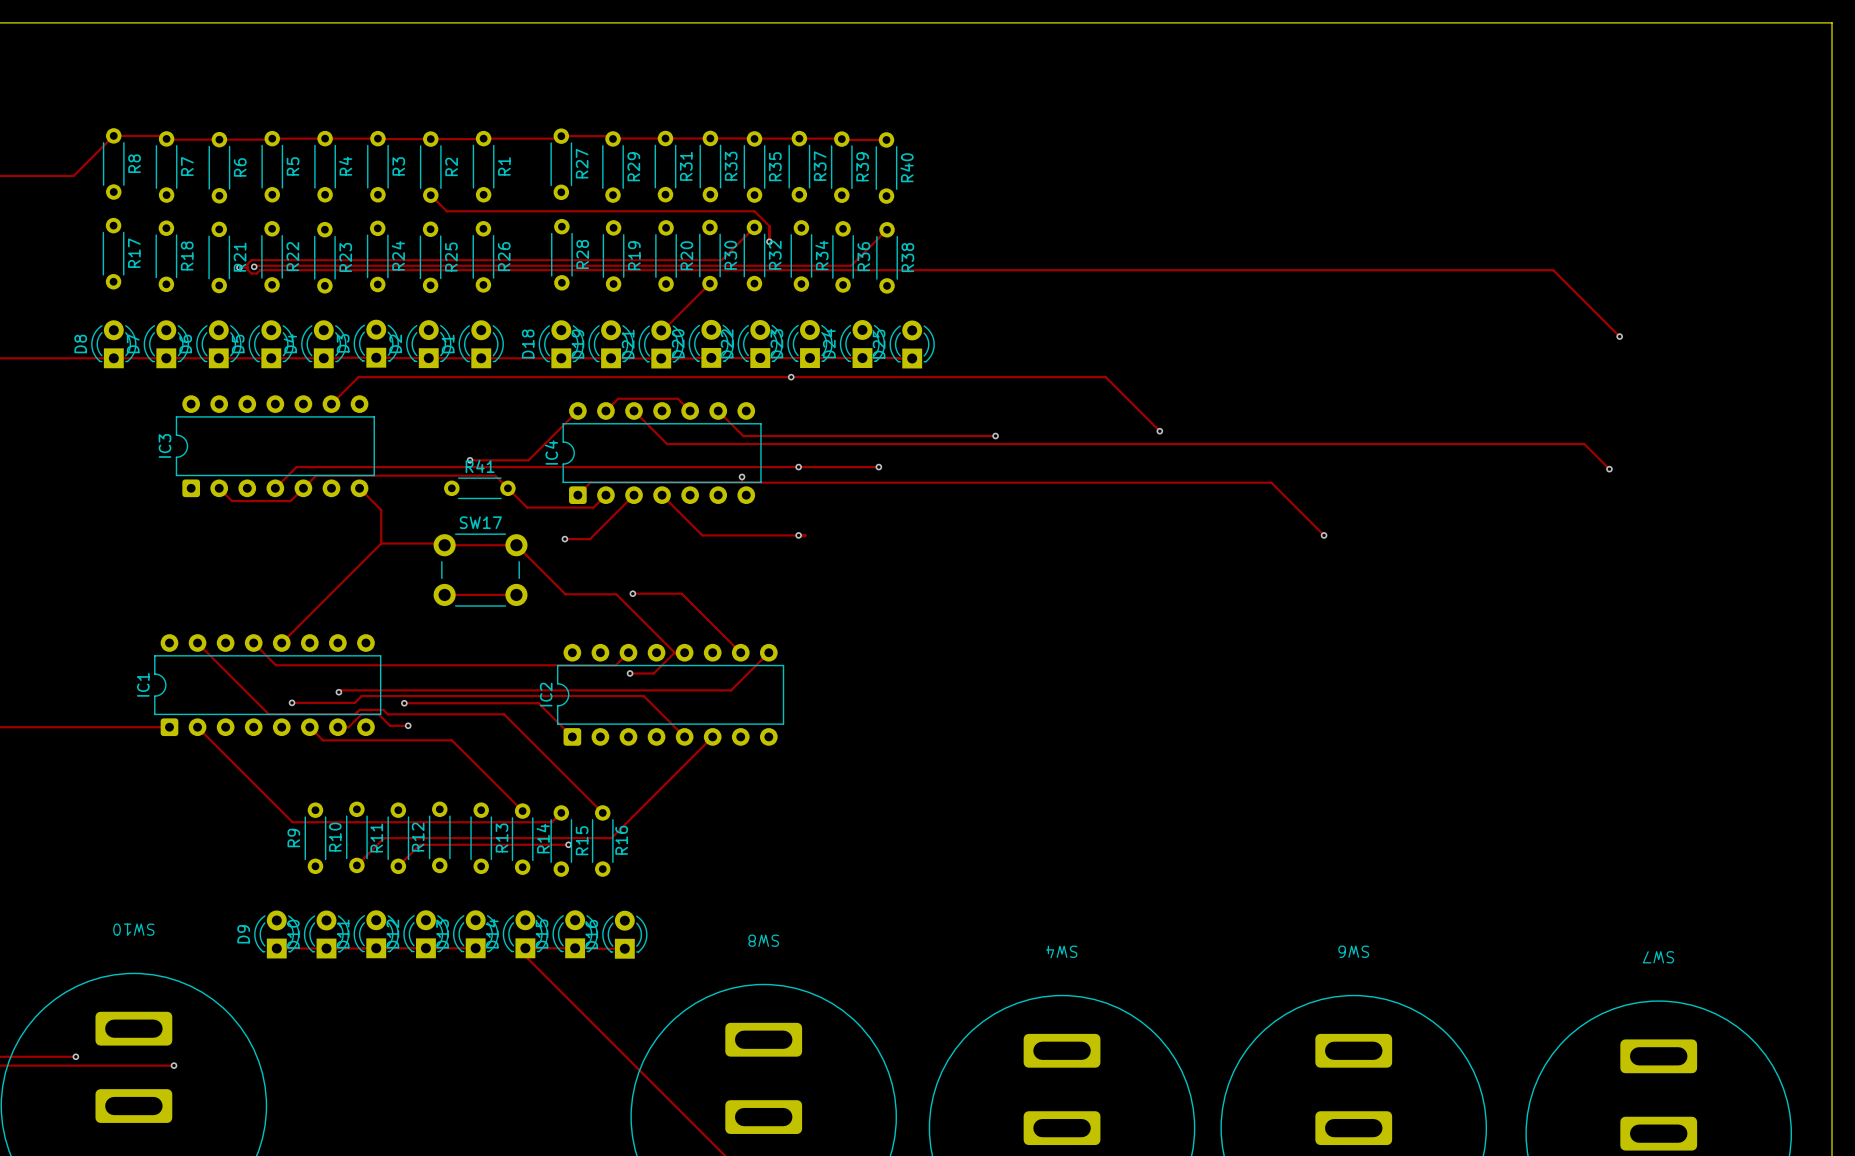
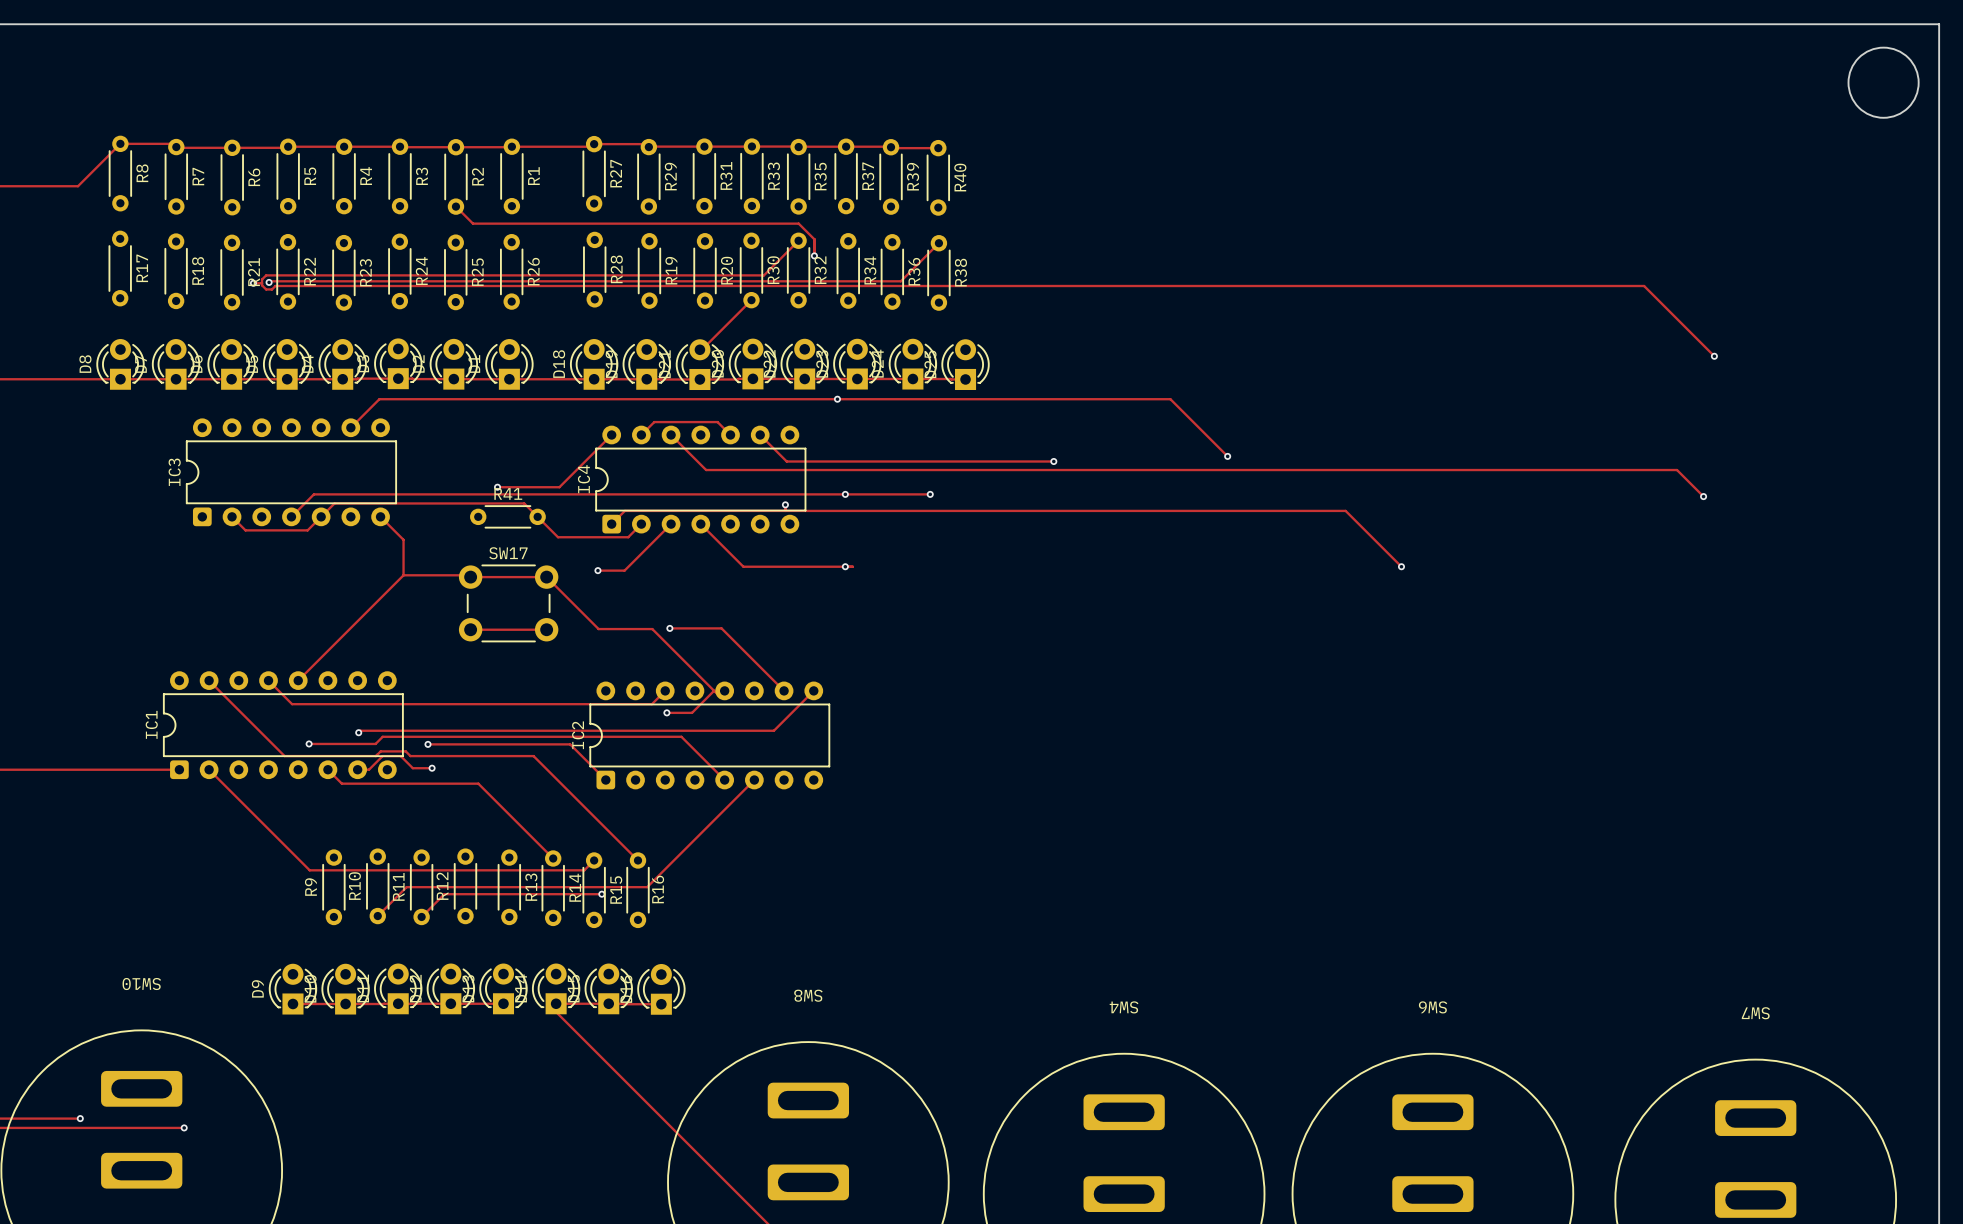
round board edge: none -> [1848, 47, 1919, 119]

